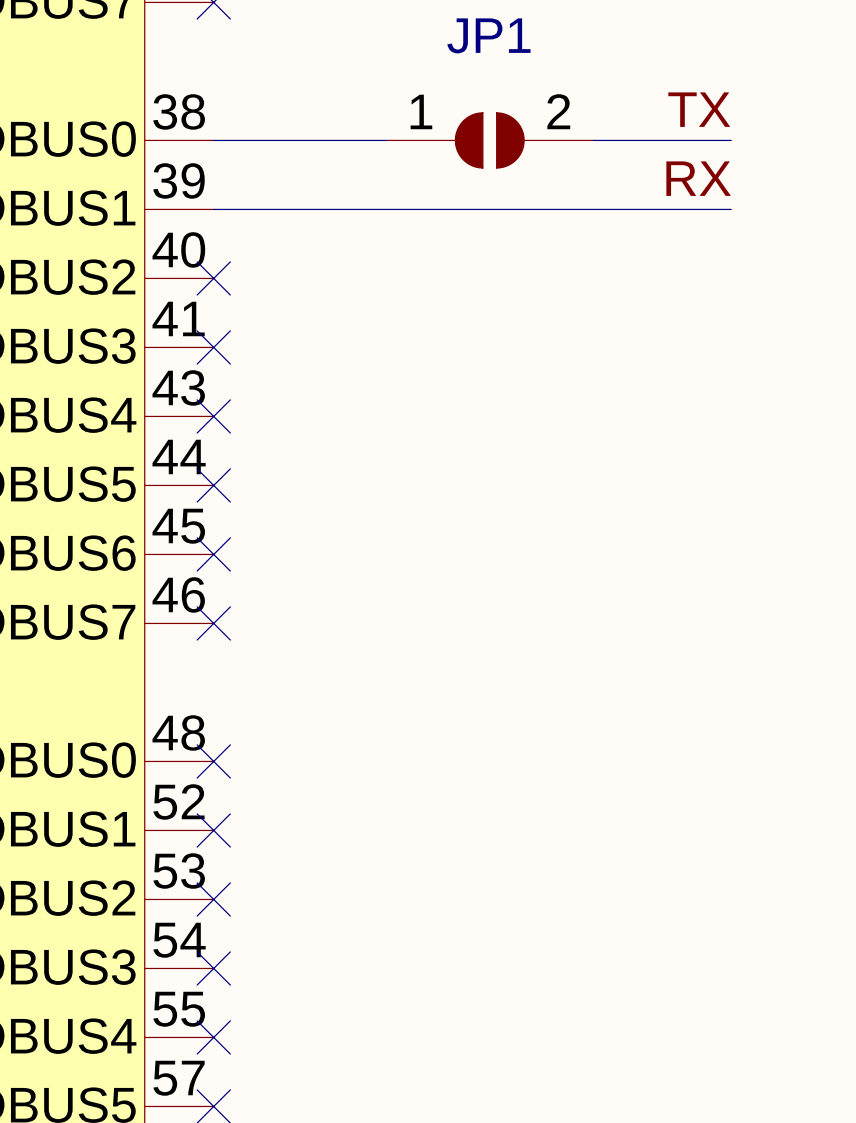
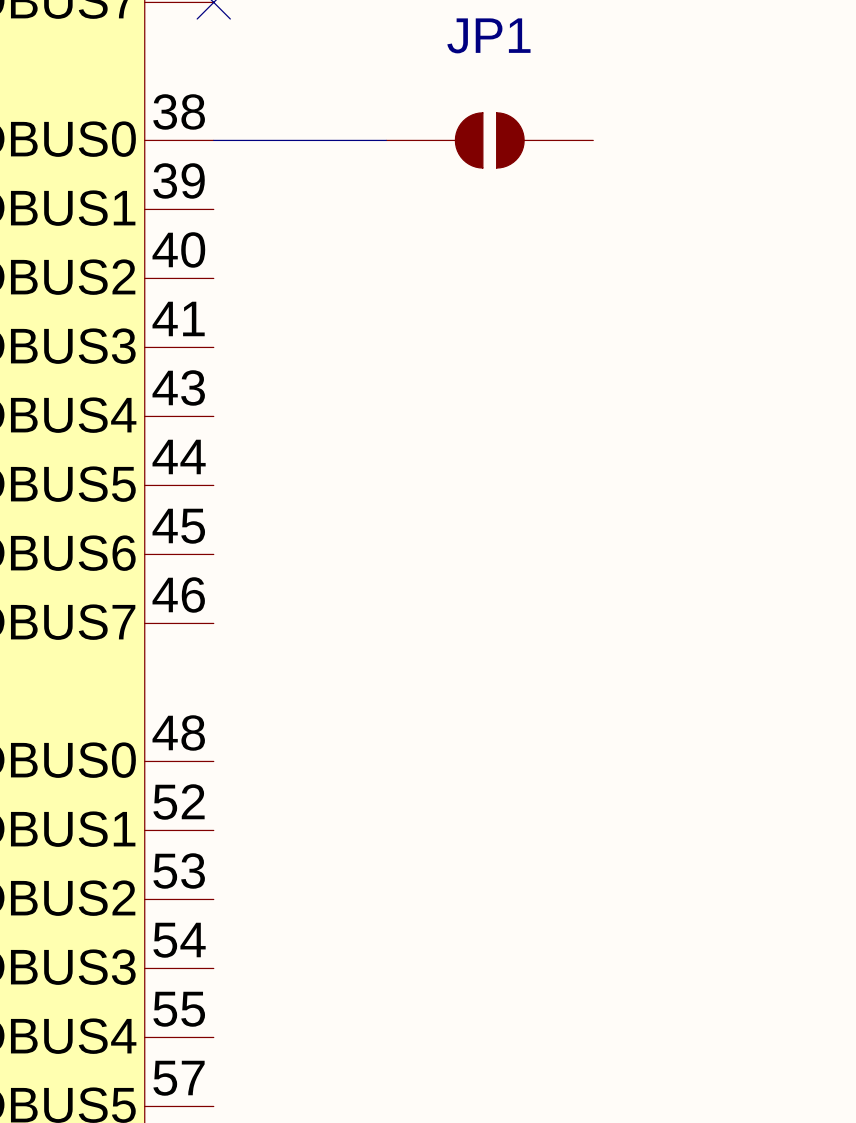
label: TX (699, 109) -> none
JP1 pin number: 1 (421, 111) -> none
JP1 pin number: 2 (558, 111) -> none
wire: (593, 140) (731, 140) -> none
label: RX (698, 178) -> none
wire: (213, 209) (731, 209) -> none
no-connect mark: (213, 278) -> none
no-connect mark: (213, 347) -> none
no-connect mark: (213, 416) -> none
no-connect mark: (213, 485) -> none
no-connect mark: (213, 554) -> none
no-connect mark: (213, 623) -> none
no-connect mark: (213, 761) -> none
no-connect mark: (213, 830) -> none
no-connect mark: (213, 899) -> none
no-connect mark: (213, 968) -> none
no-connect mark: (213, 1037) -> none
no-connect mark: (213, 1106) -> none

